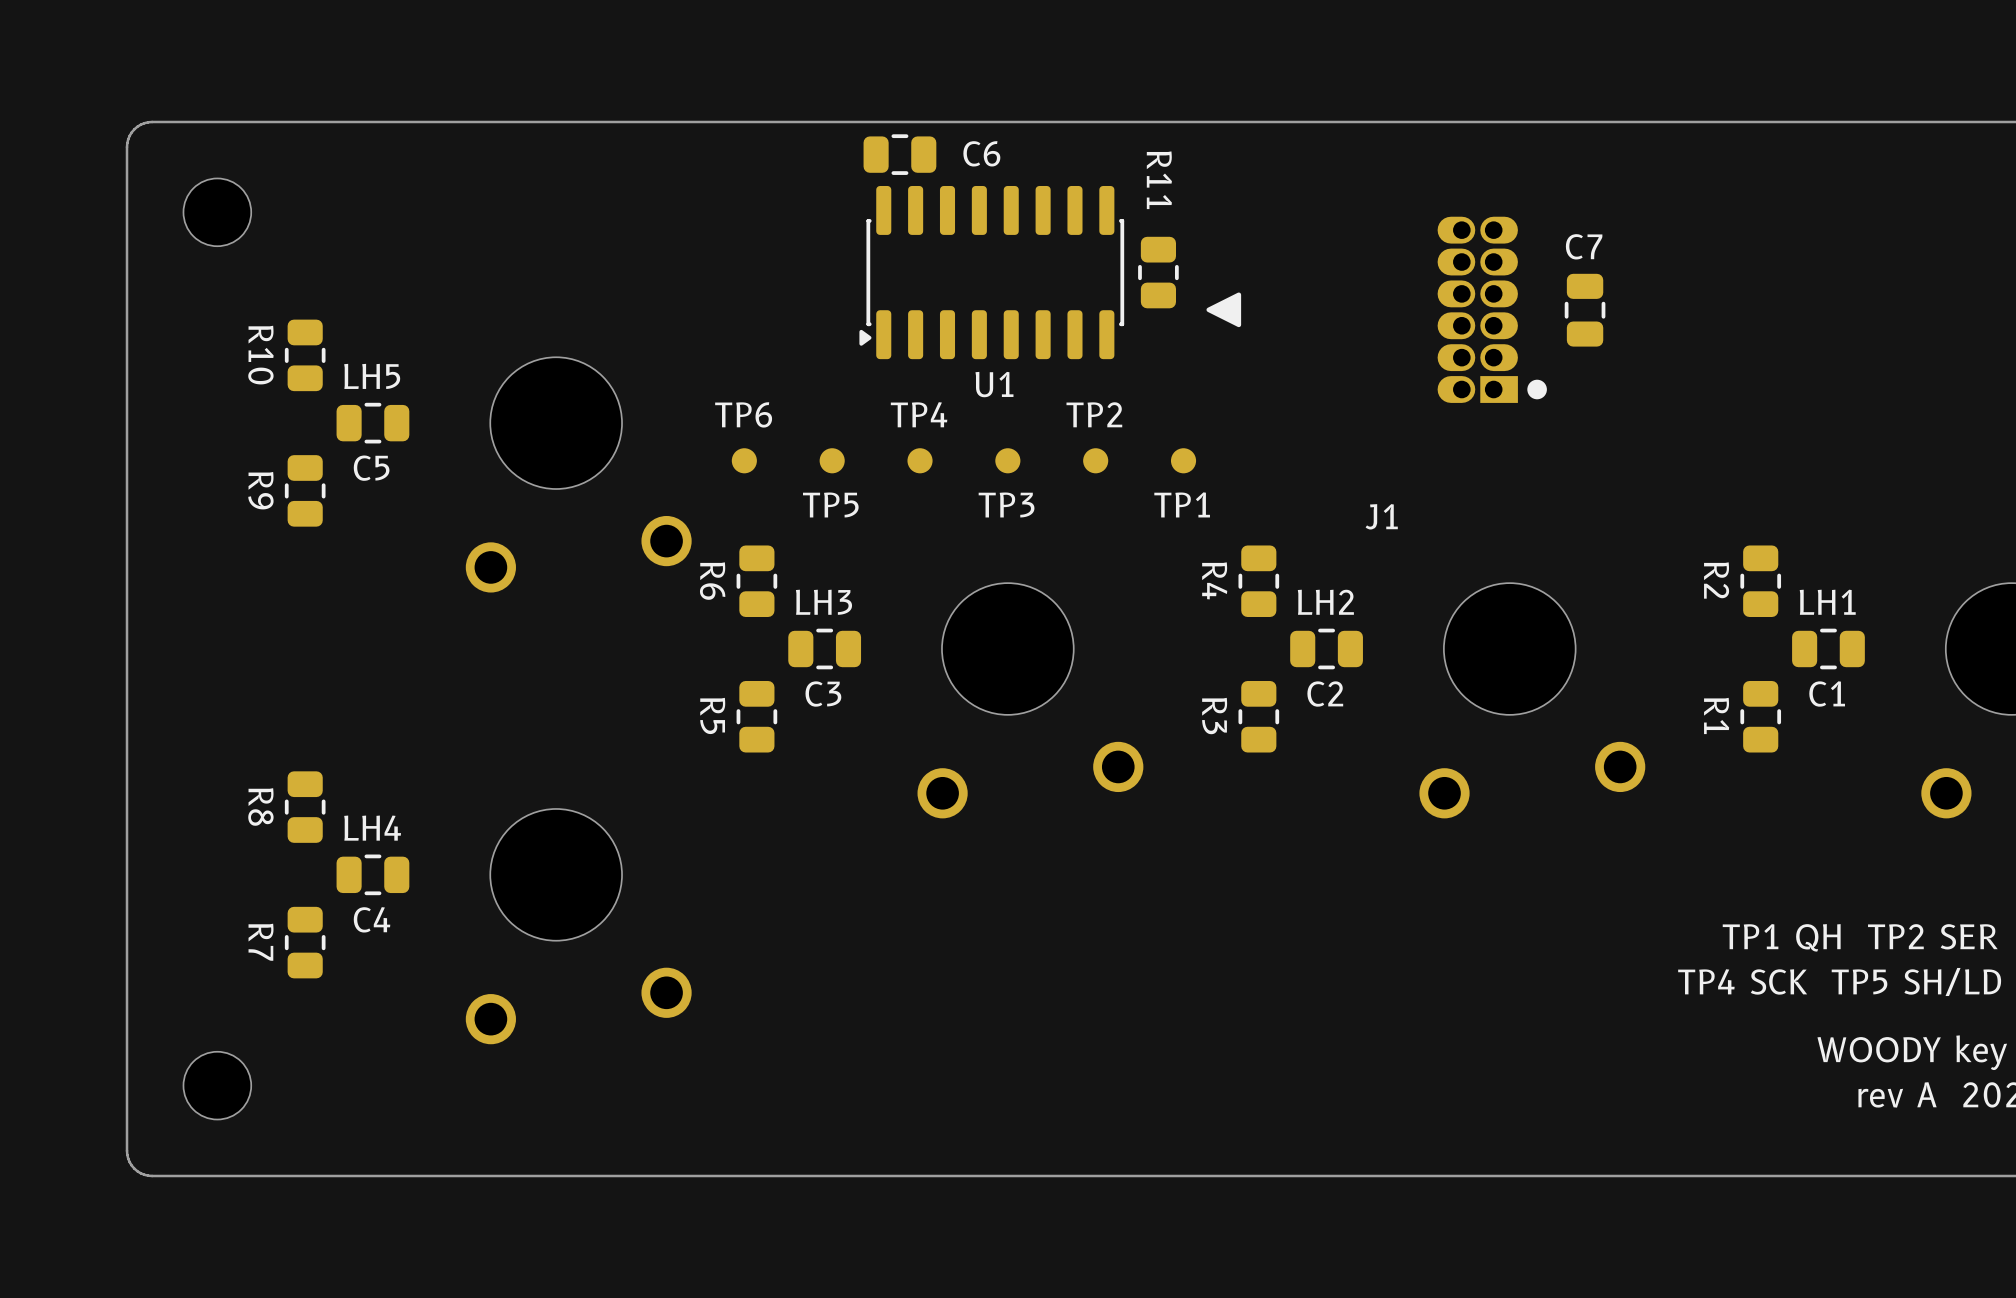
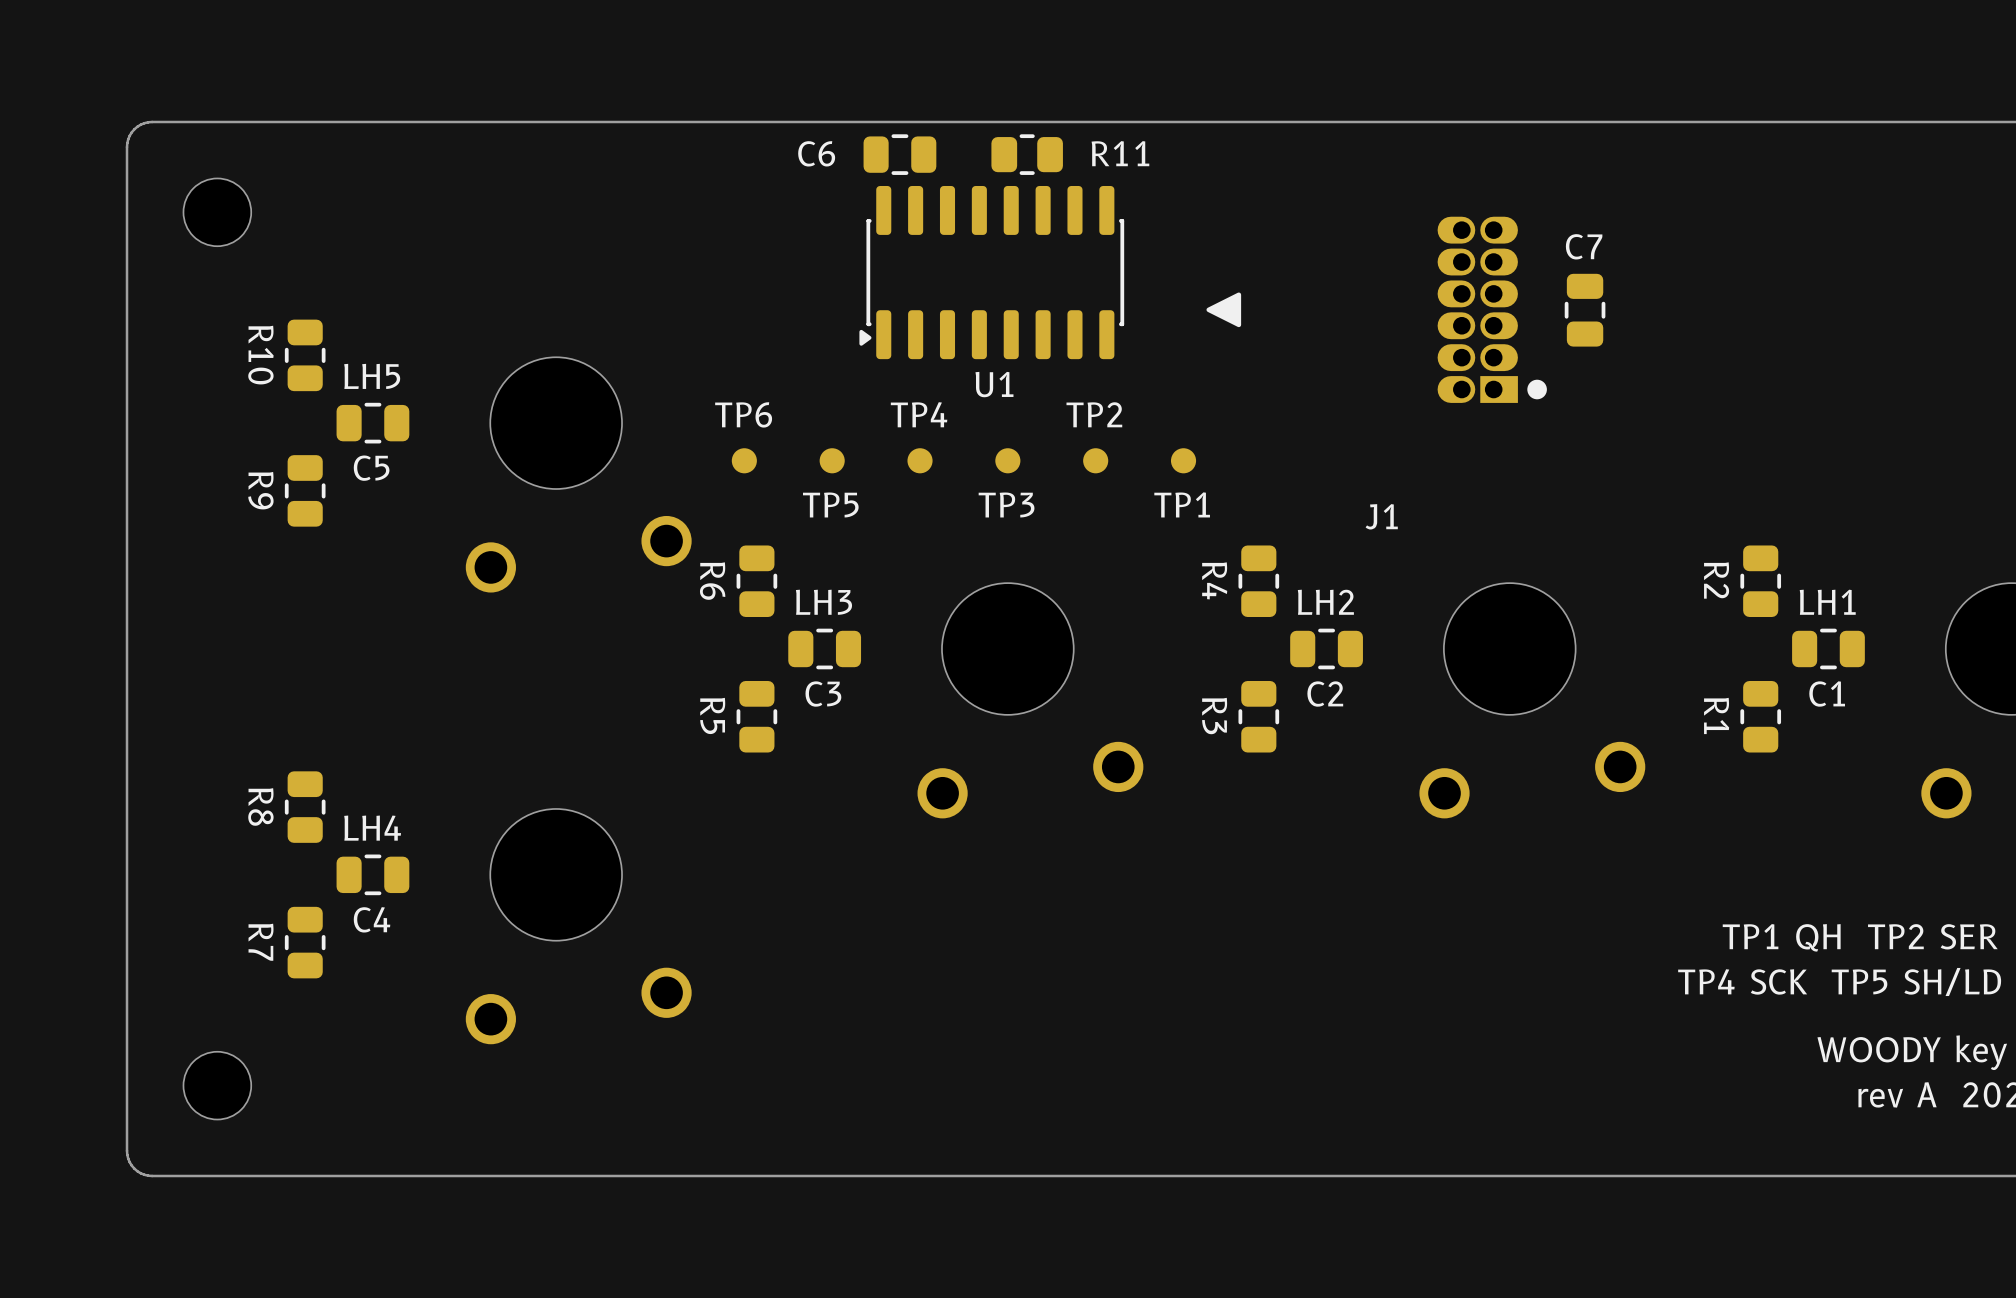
text position: C6 (981, 153) -> C6 (816, 153)
text rotation: 0° (1159, 180) -> 90° counterclockwise (1120, 153)
part rotation: 0° (1158, 272) -> 90° clockwise (1027, 154)
part position: (1158, 272) -> (1027, 154)

